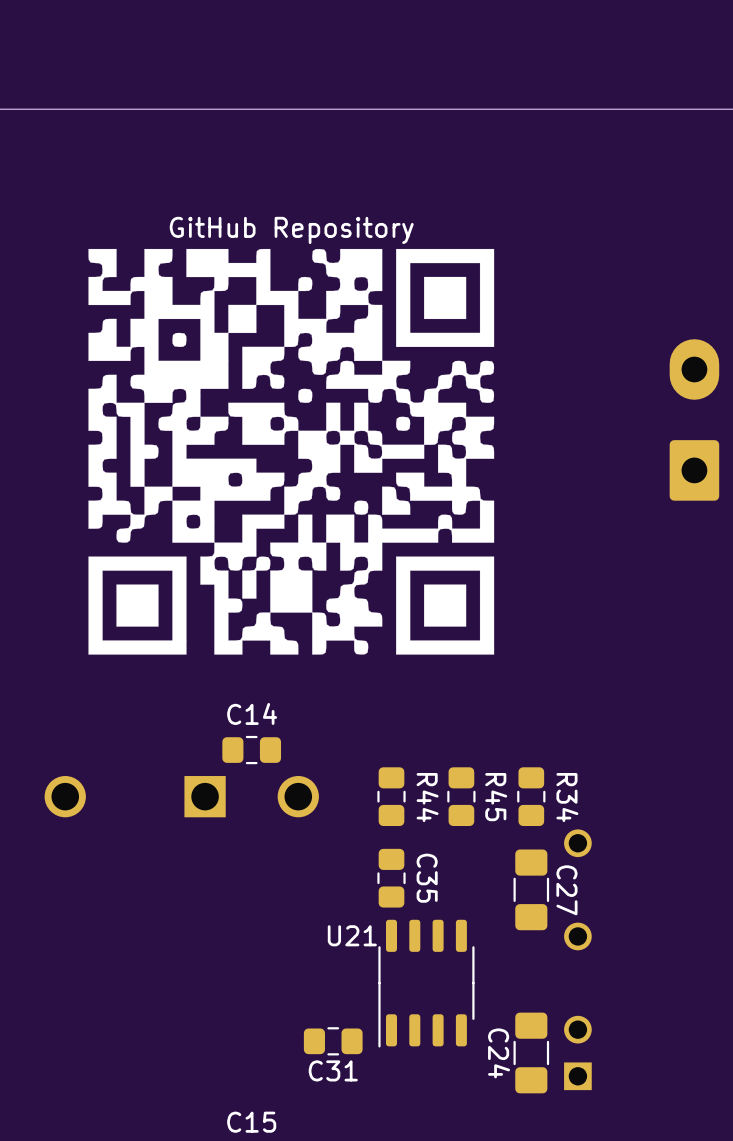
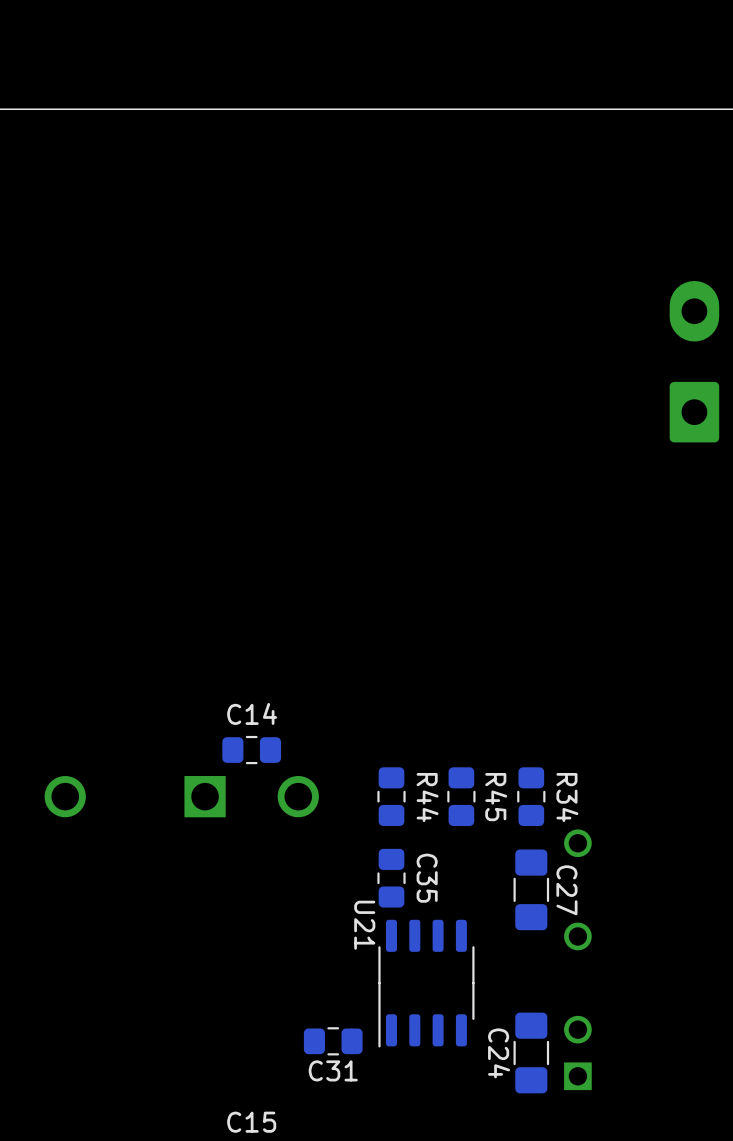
text: GitHub Repository (291, 230) -> none
drawing: [88, 248, 495, 655] -> none
part position: (694, 419) -> (694, 361)
U21 name rotation: 0° (352, 935) -> 90° clockwise (364, 925)

